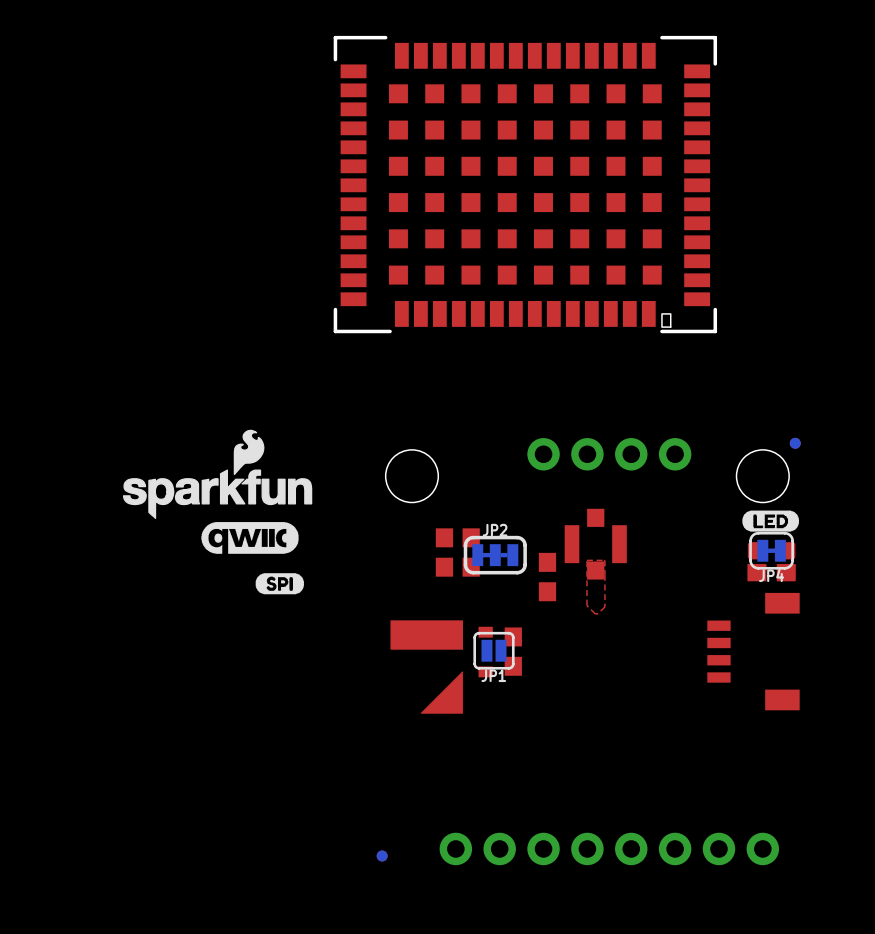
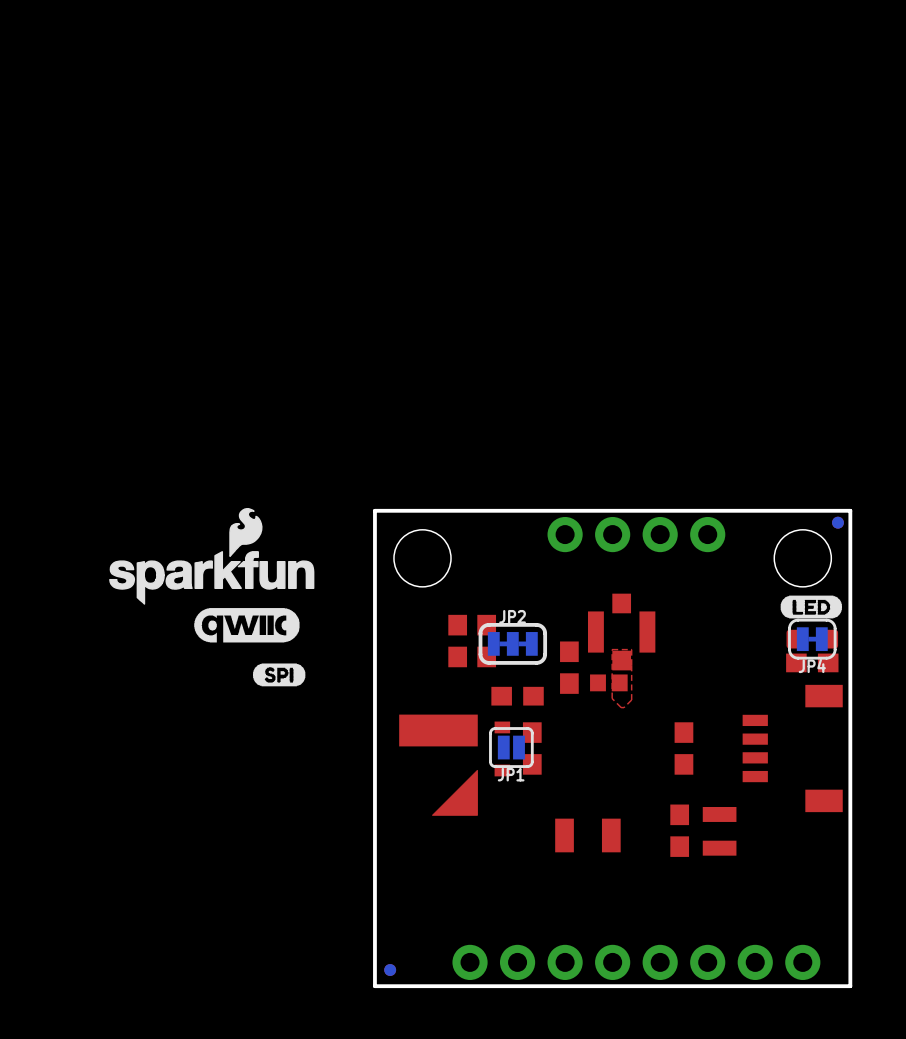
part: (525, 184) -> none
board edge: none -> (850, 510) (374, 510) (374, 986) (850, 986) (850, 510)
part: none -> (608, 682)
part: none -> (517, 696)
part: none -> (683, 748)
part: none -> (679, 830)
part: none -> (719, 831)
part: none -> (587, 835)

